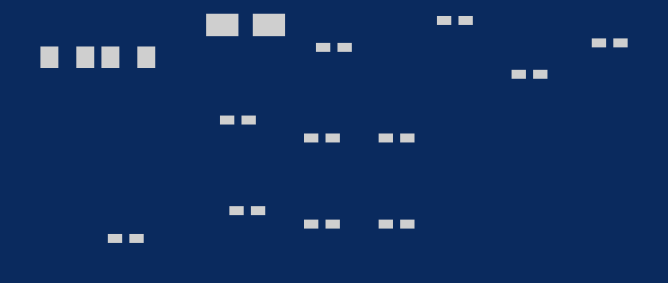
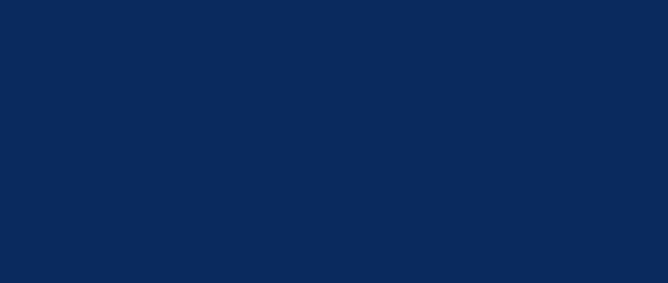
part: (454, 20) -> none
part: (245, 24) -> none
part: (609, 42) -> none
part: (333, 47) -> none
part: (67, 57) -> none
part: (128, 57) -> none
part: (529, 74) -> none
part: (237, 120) -> none
part: (321, 137) -> none
part: (396, 137) -> none
part: (247, 210) -> none
part: (321, 224) -> none
part: (396, 224) -> none
part: (125, 238) -> none

